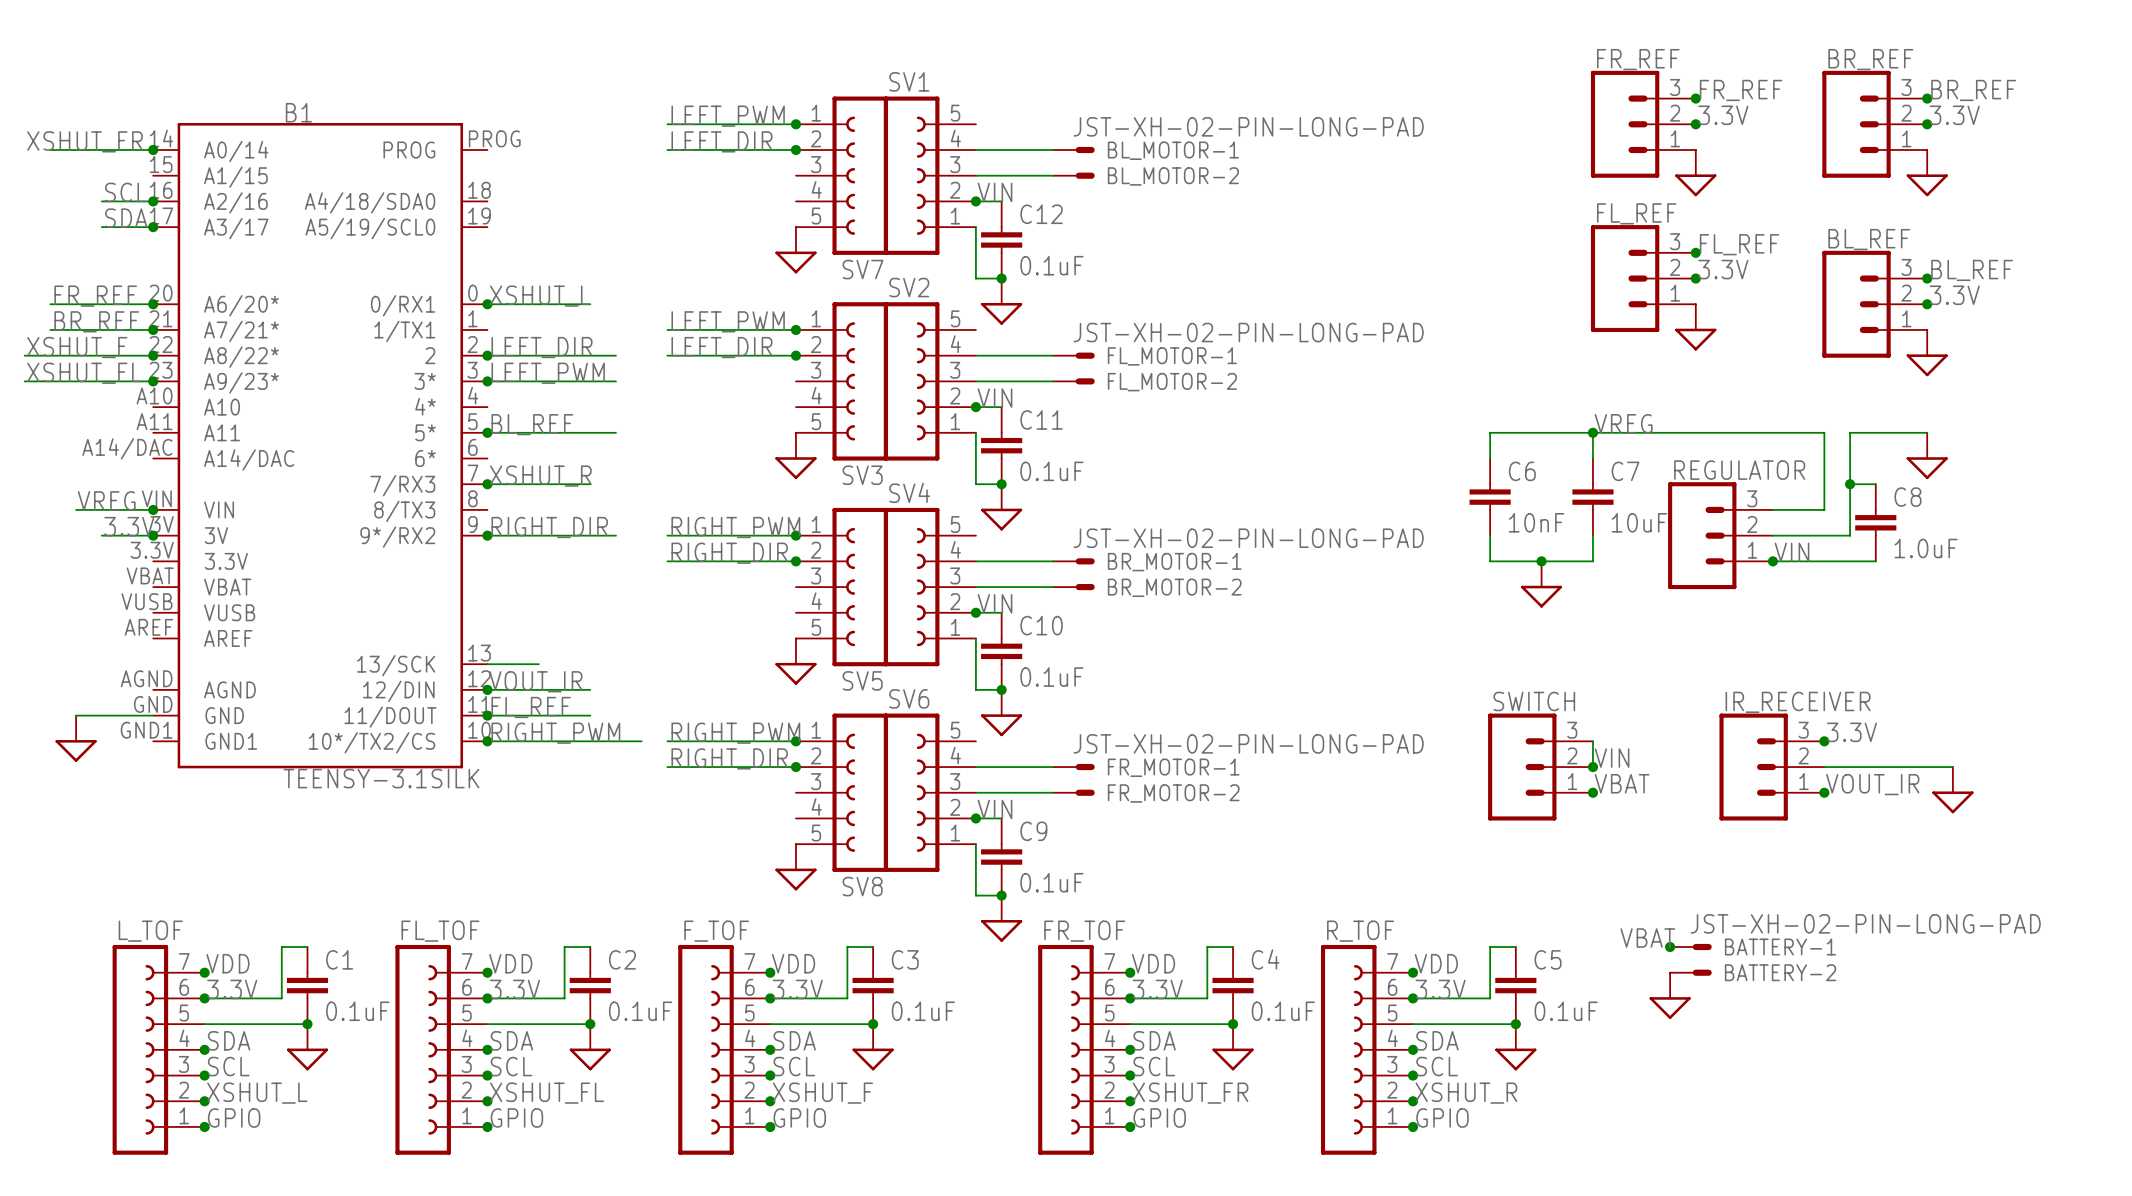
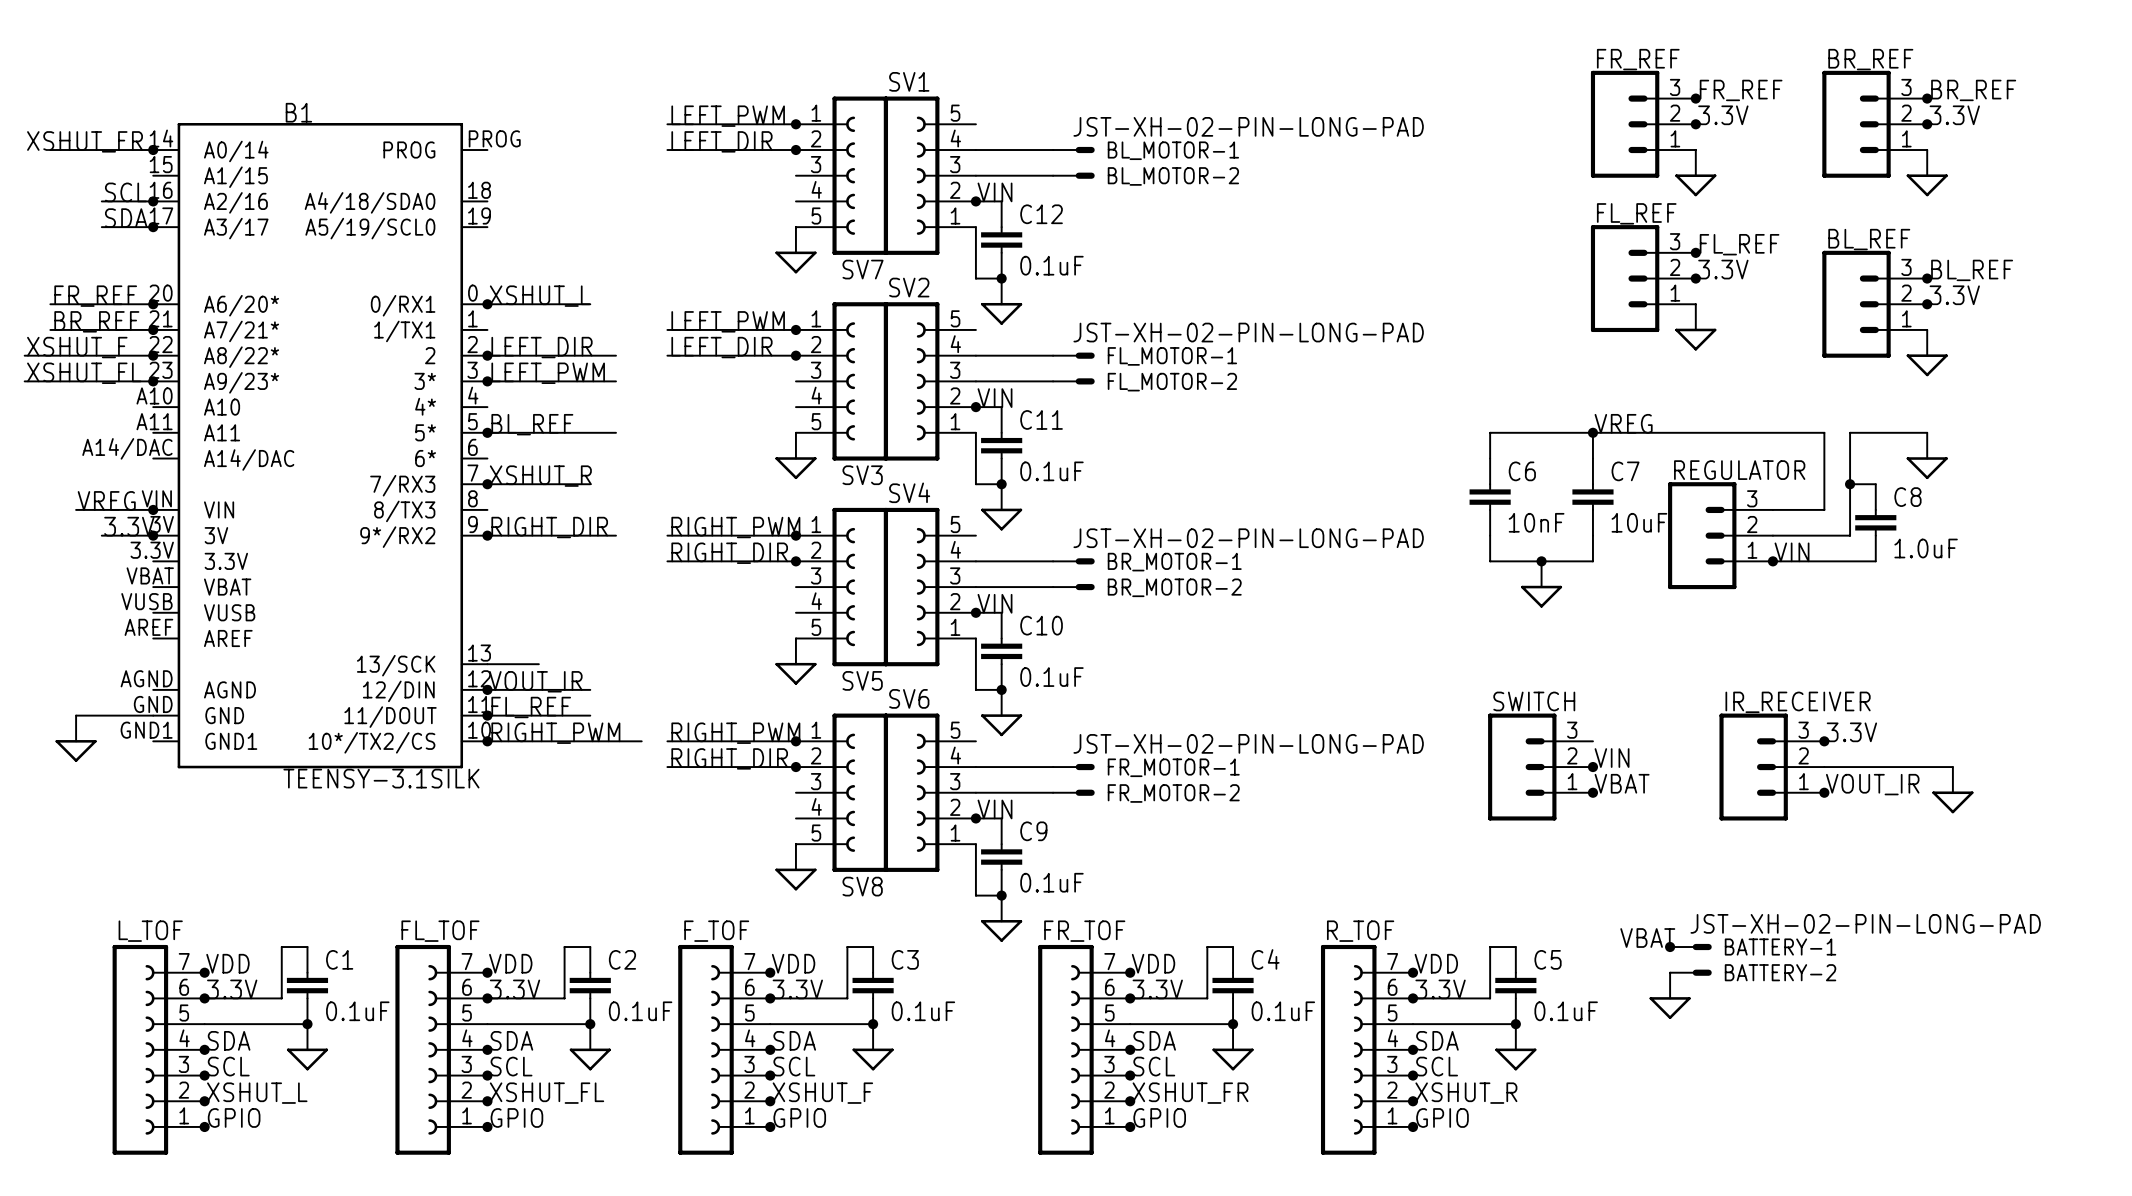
wire: (1592, 741) (1592, 767) -> none

